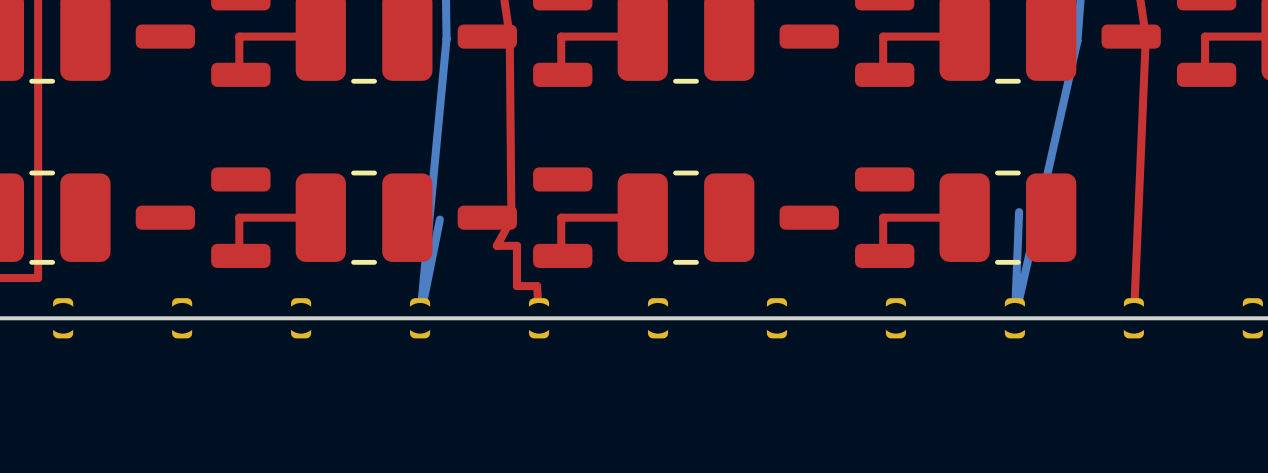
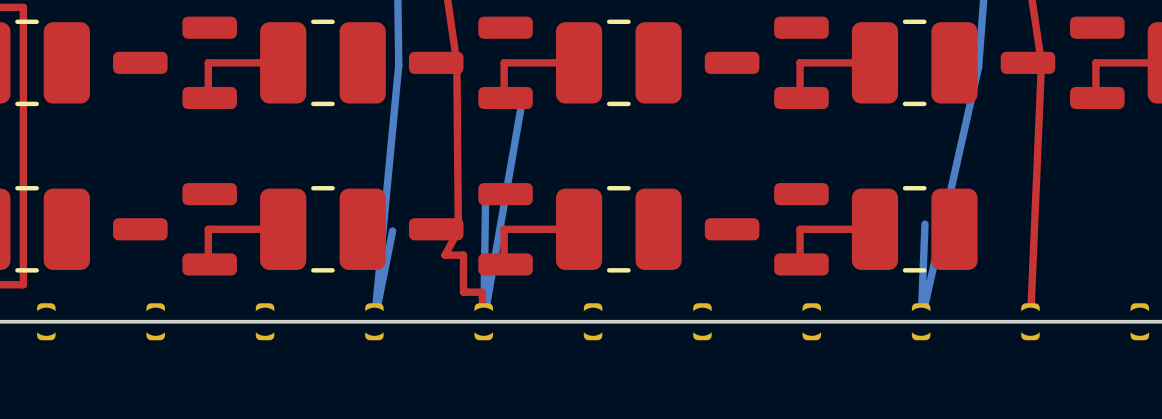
bottom track: none -> (522, 99) (483, 321) (485, 191)

